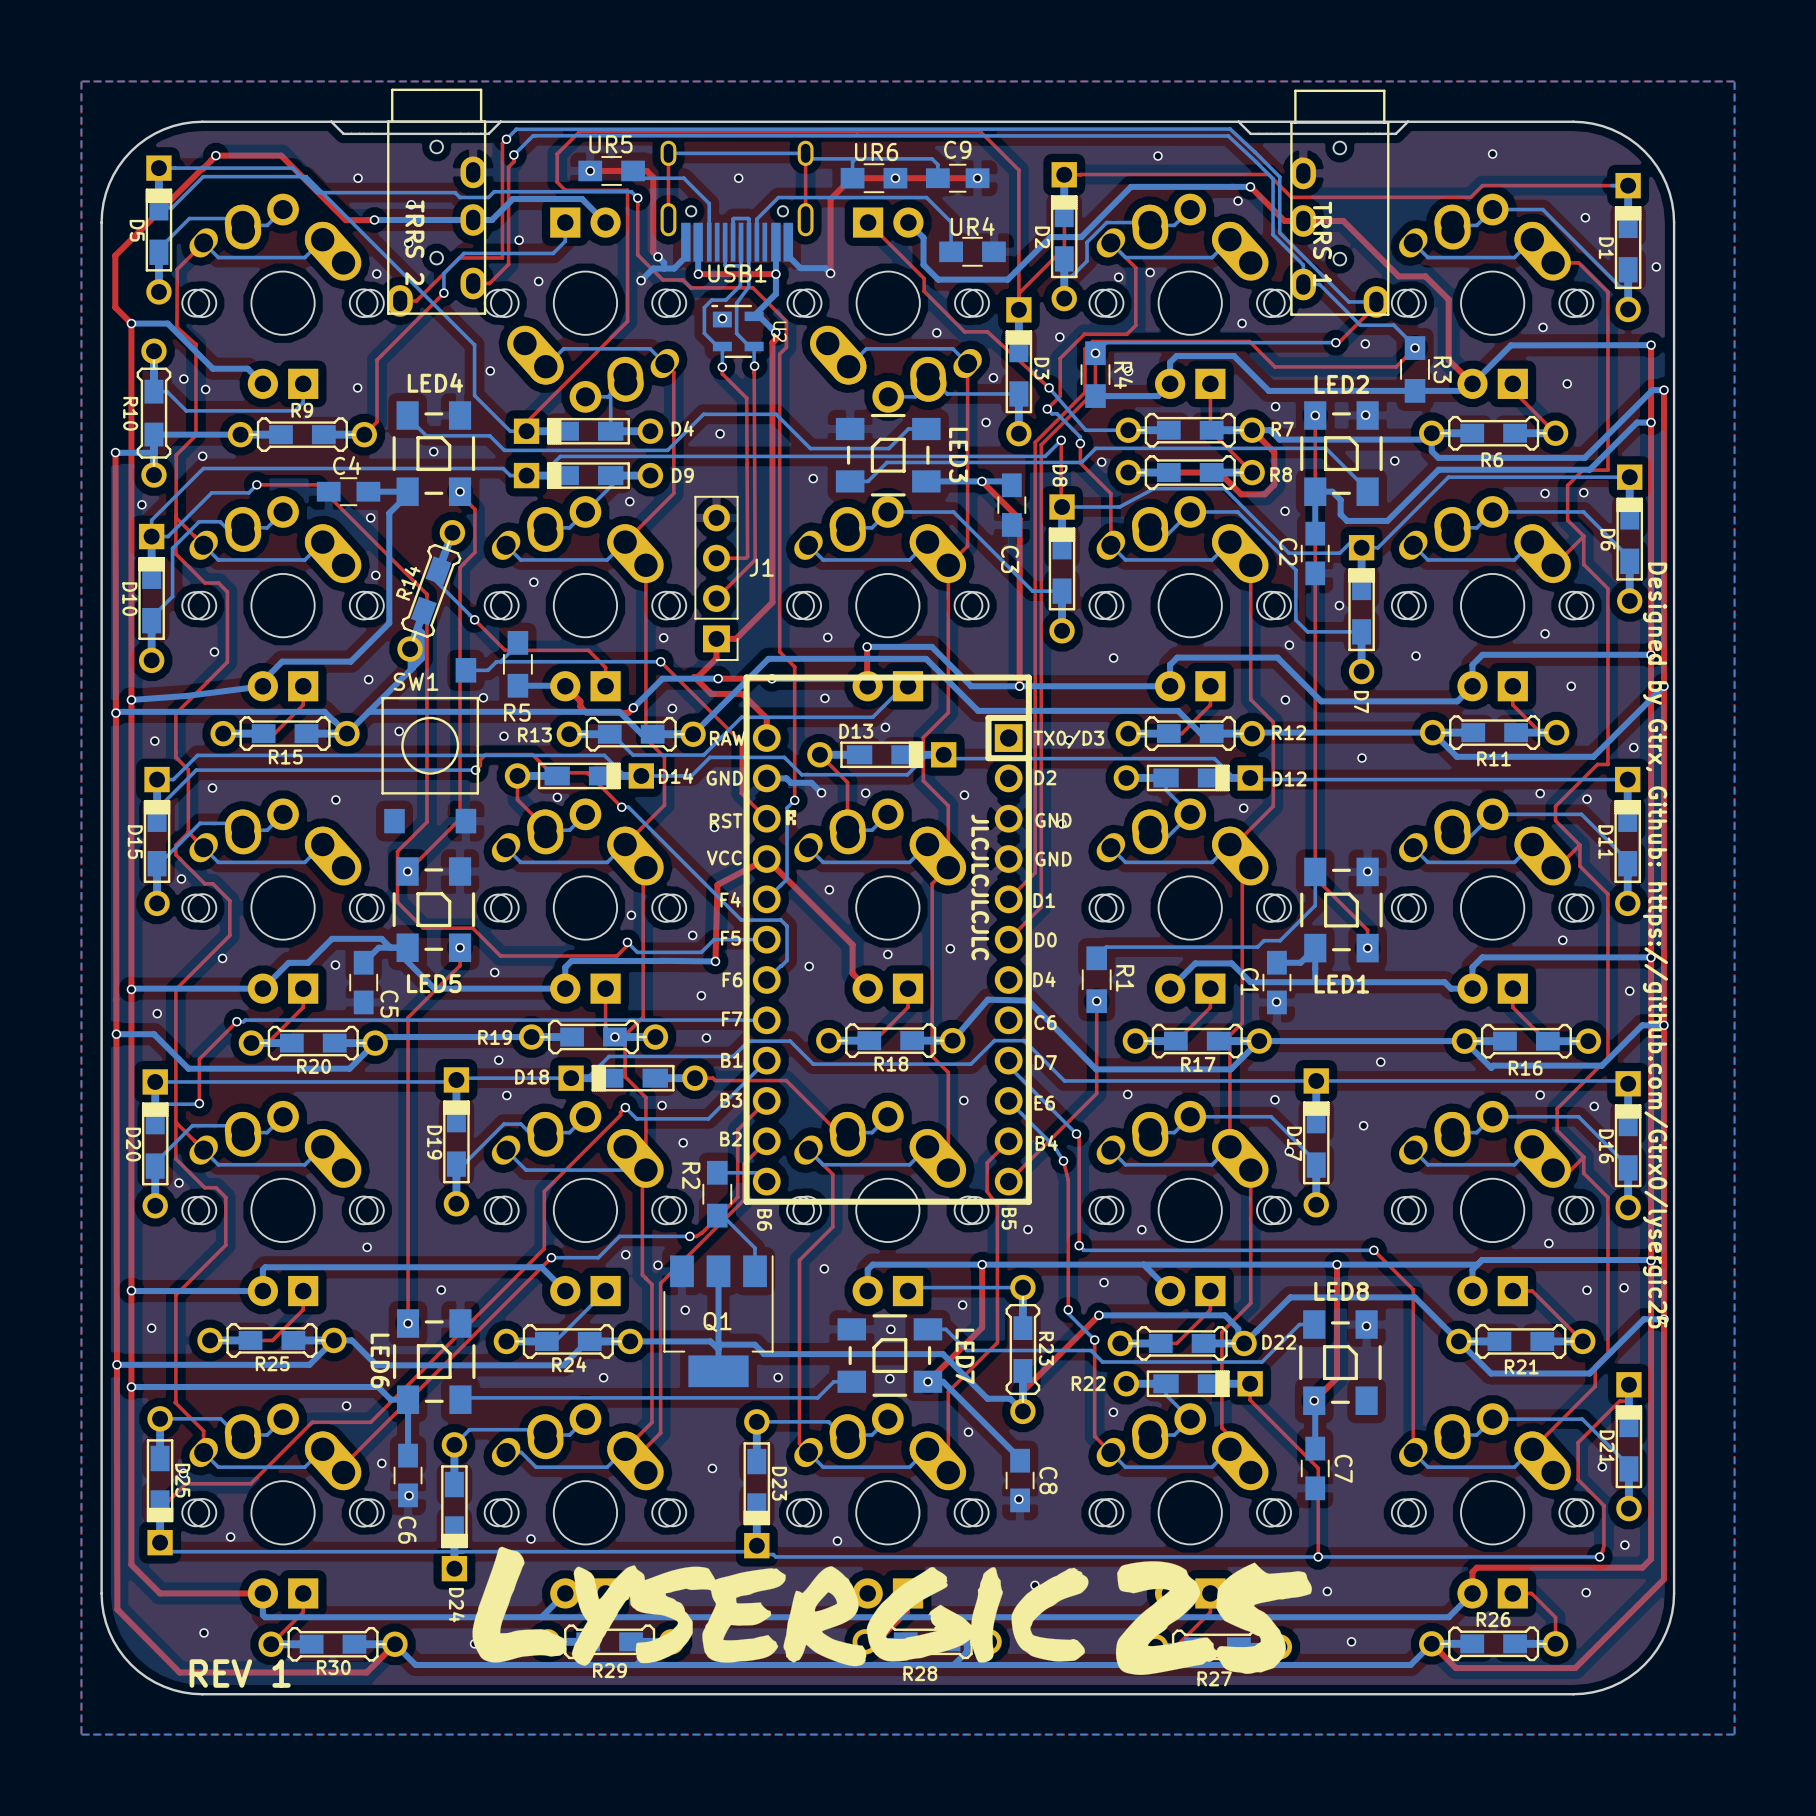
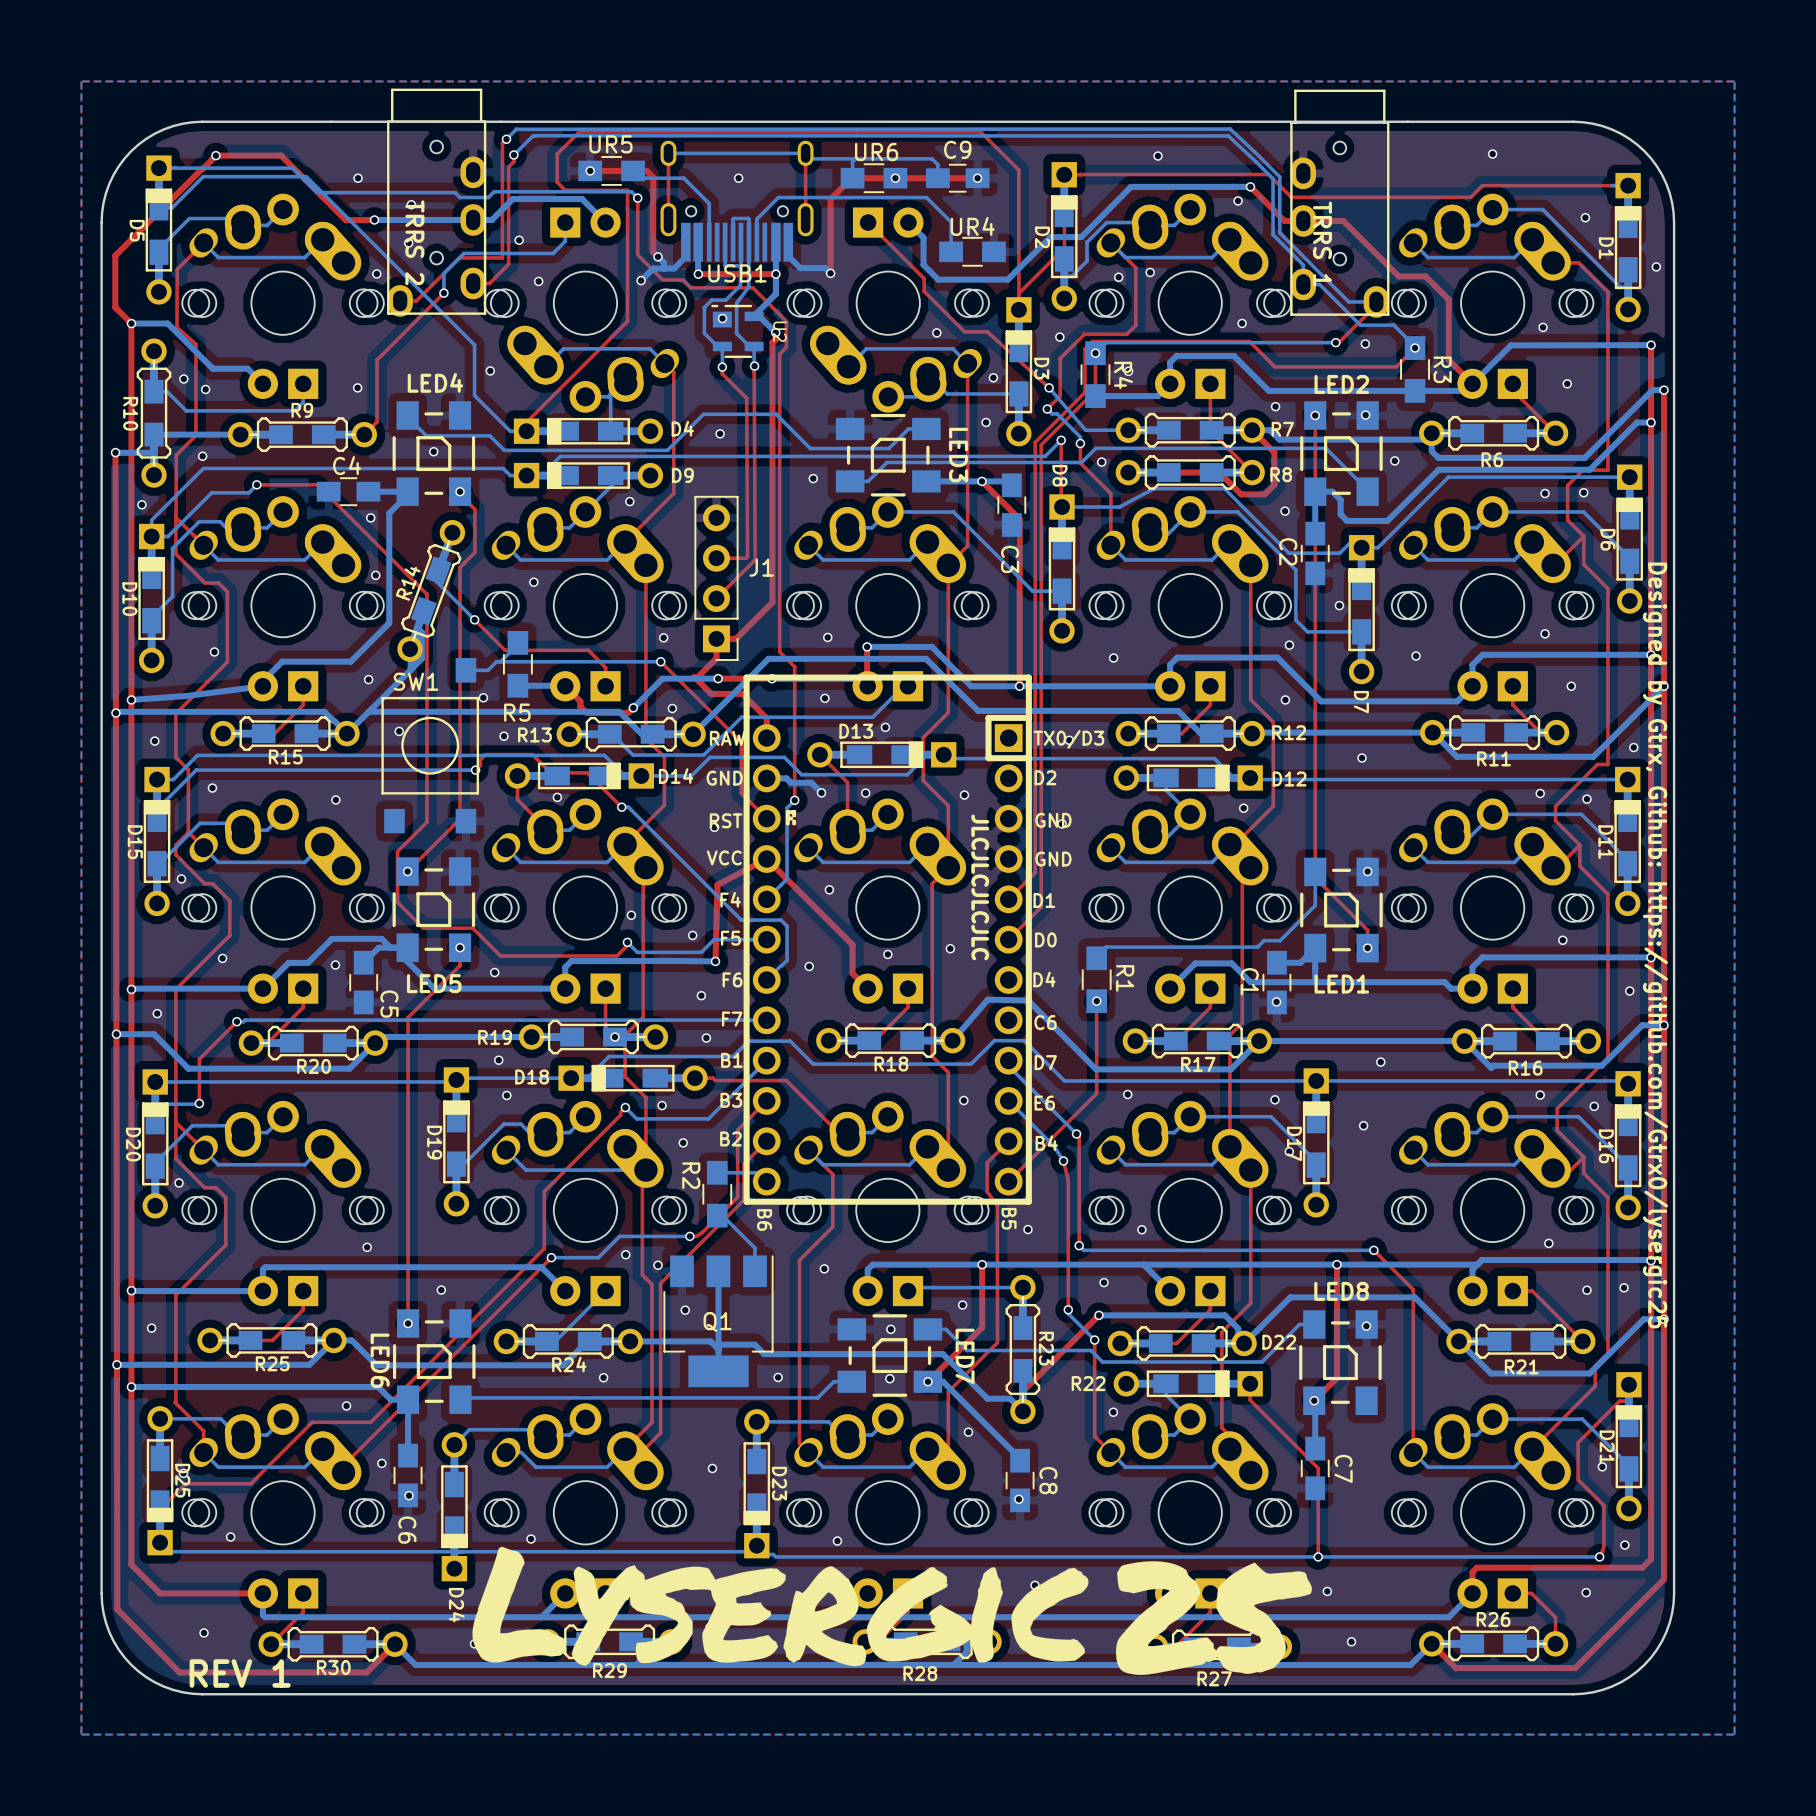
board edge: (500, 121) (488, 133) (343, 133) (331, 121) -> none
board edge: (1407, 121) (1395, 133) (1250, 133) (1238, 121) -> none

